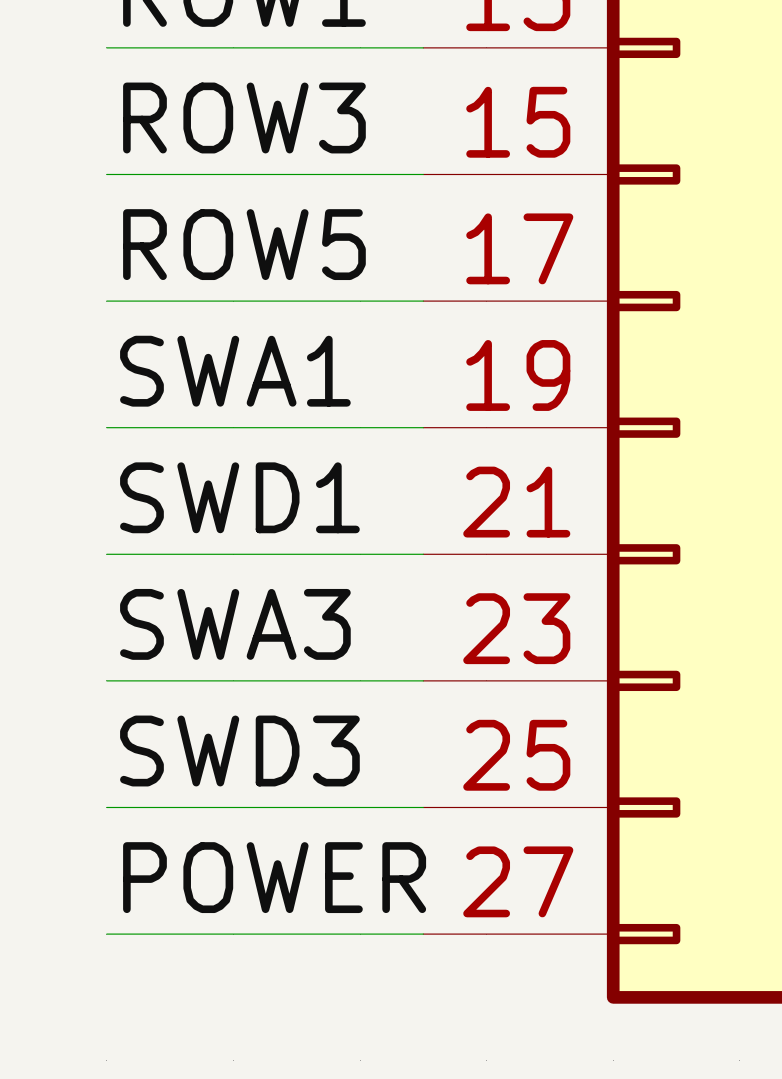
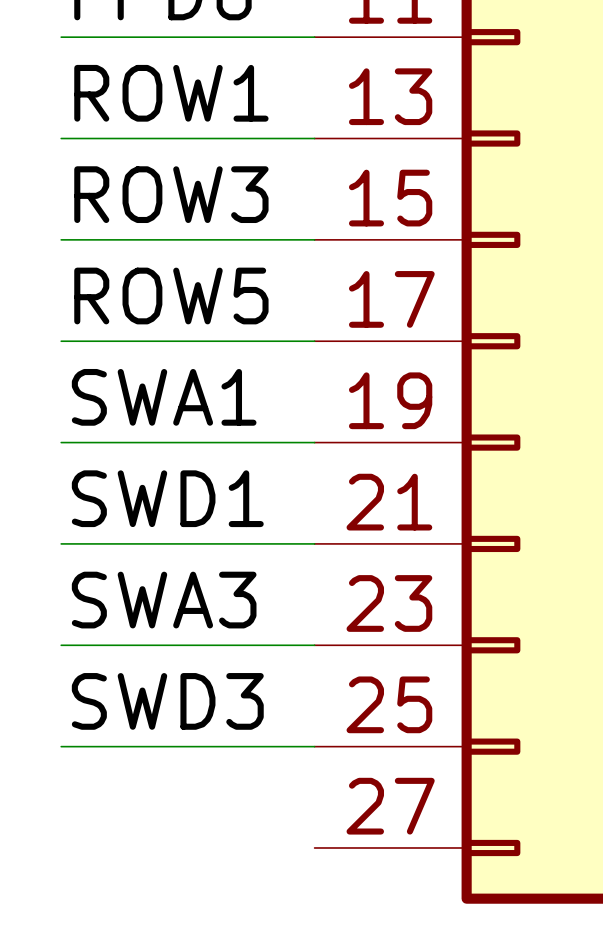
label: POWER (274, 877) -> none
wire: (106, 934) (423, 934) -> none

